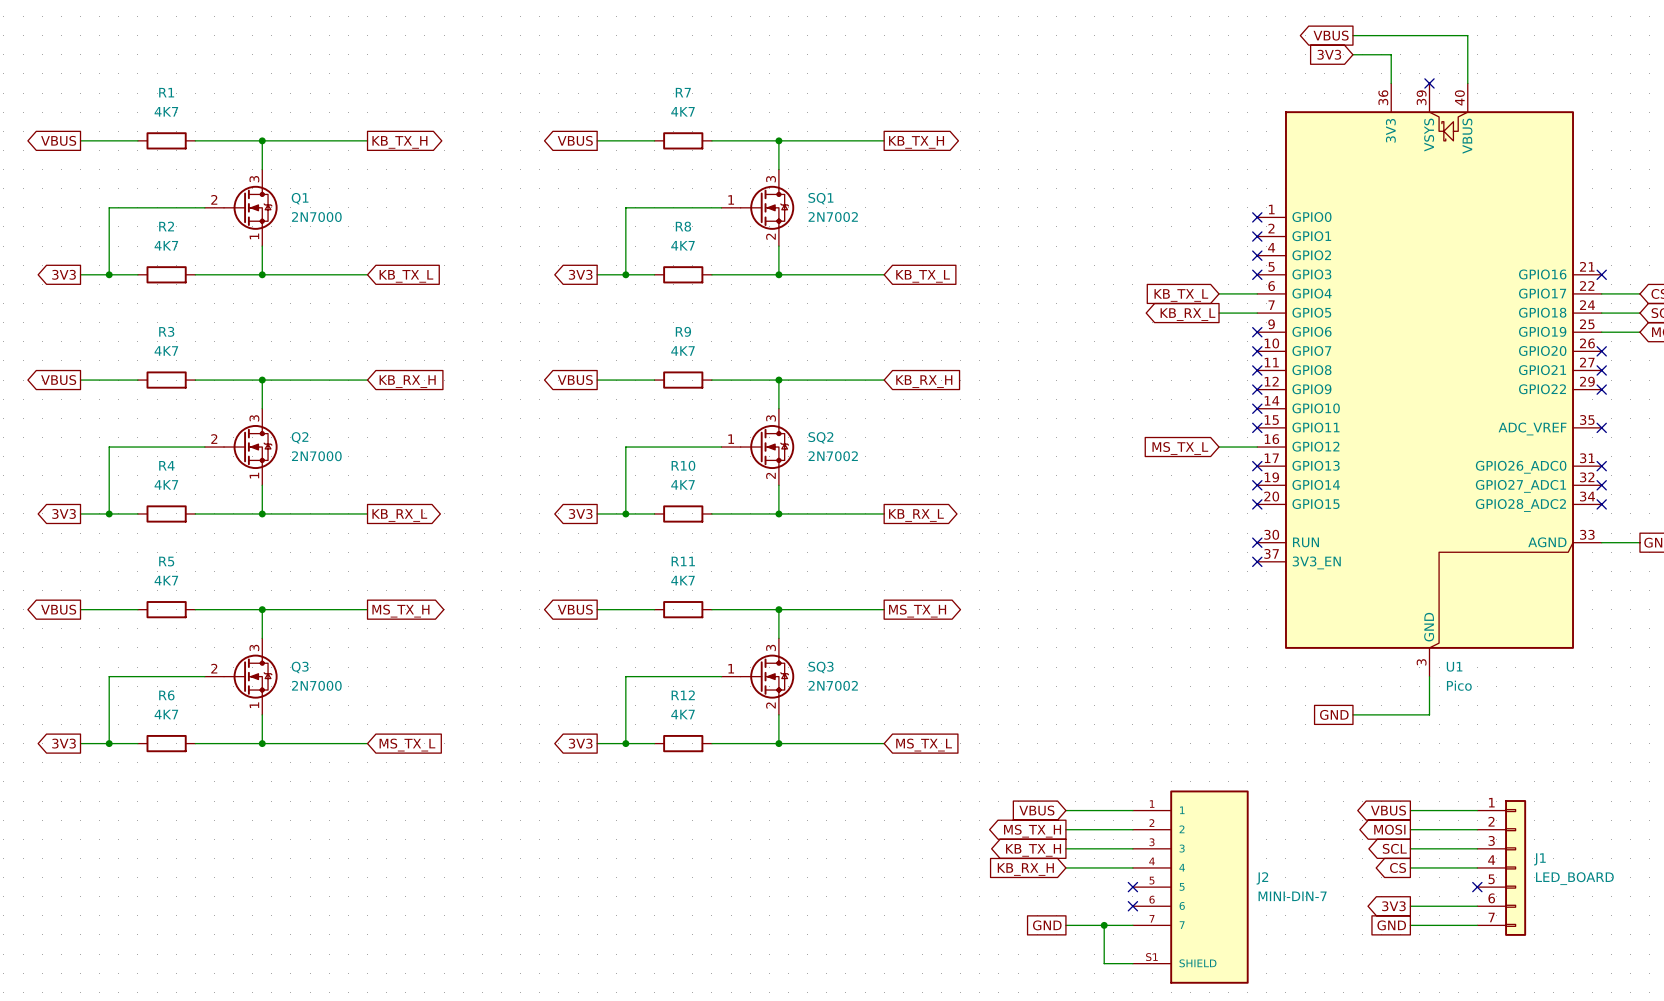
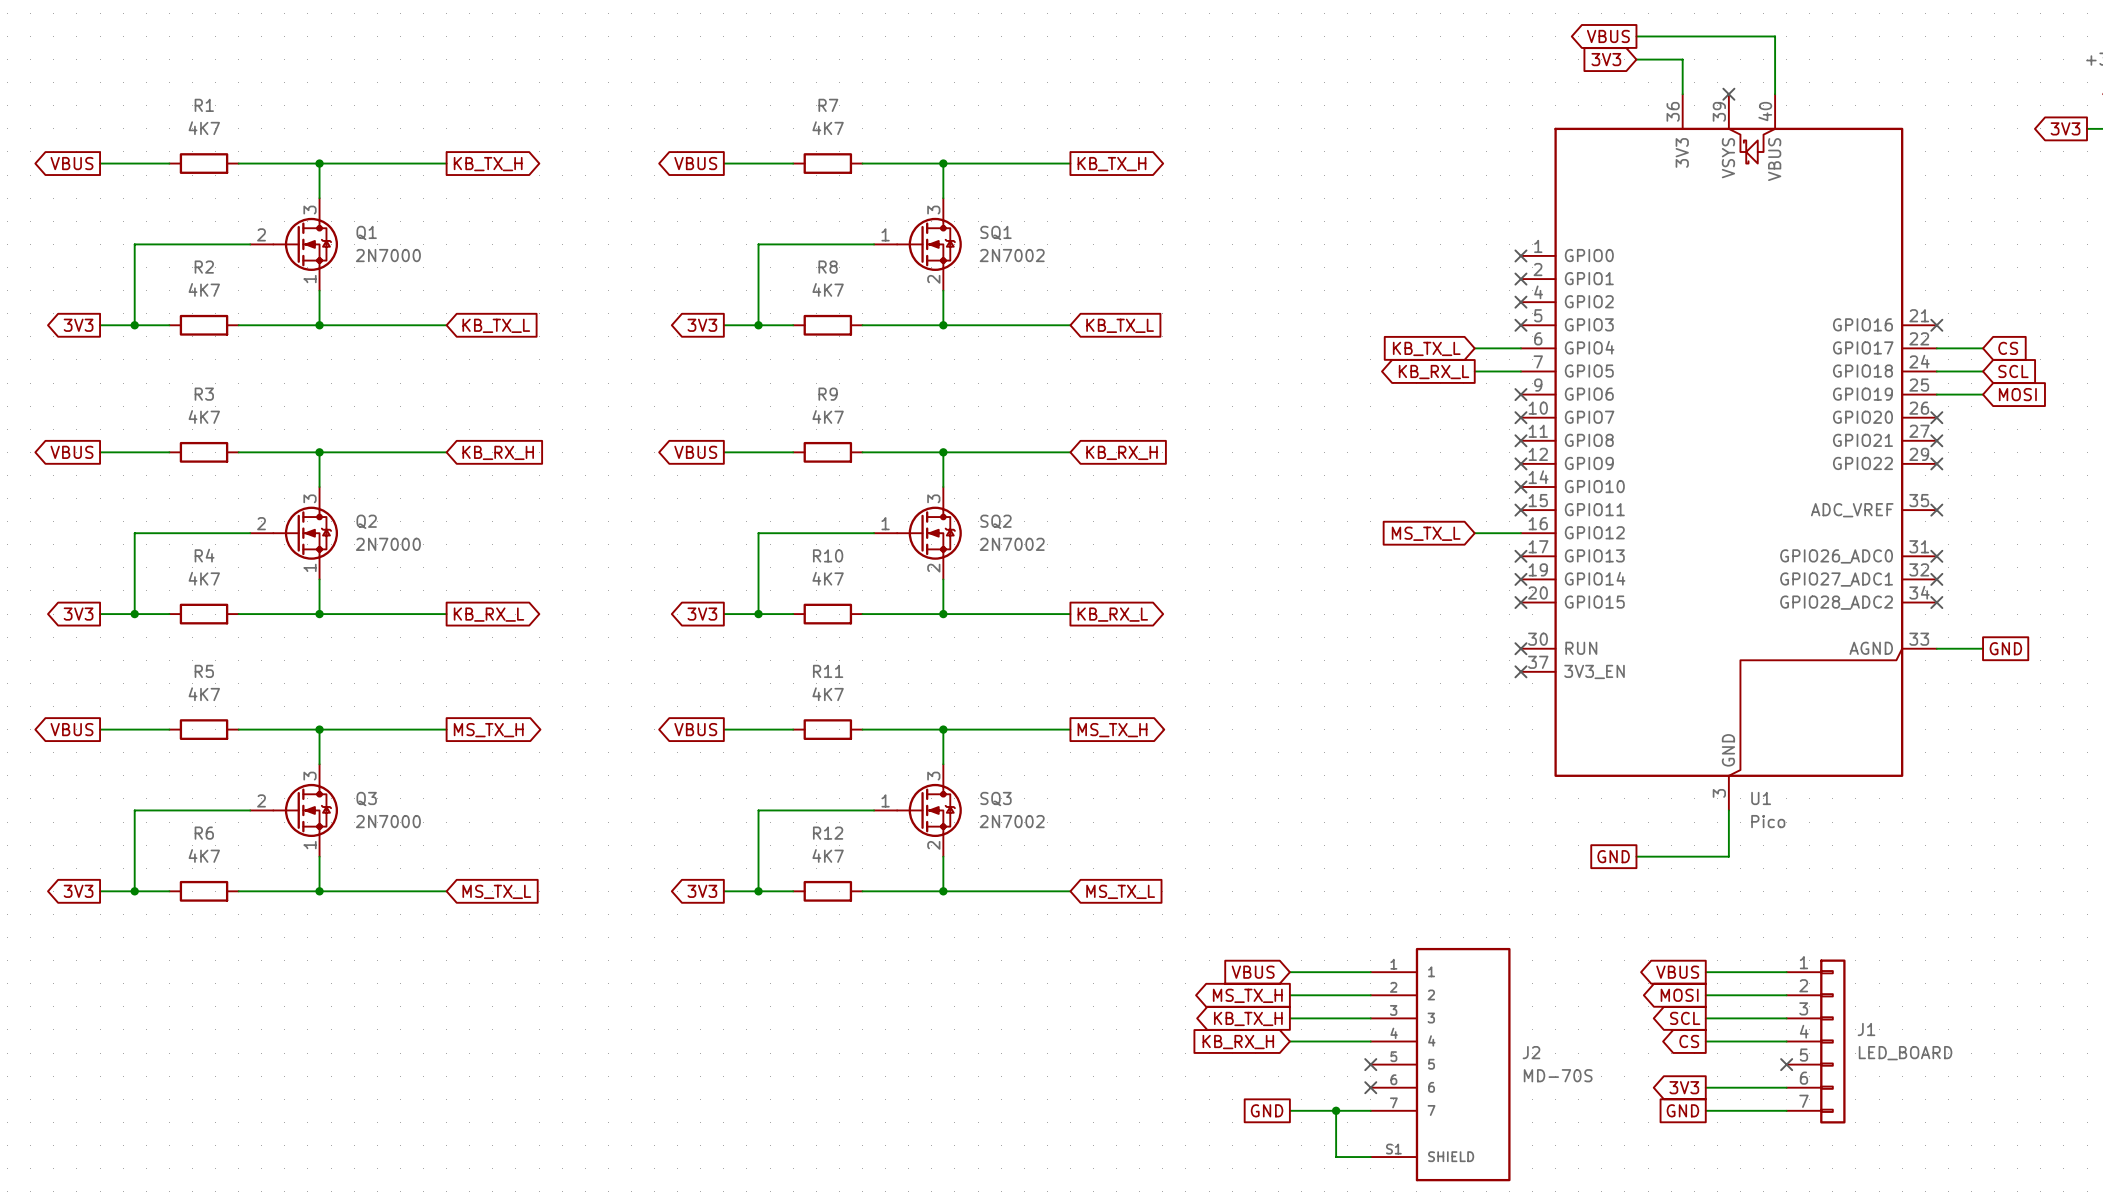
J2 value: MINI-DIN-7 (1292, 896) -> MD-70S (1558, 1075)

